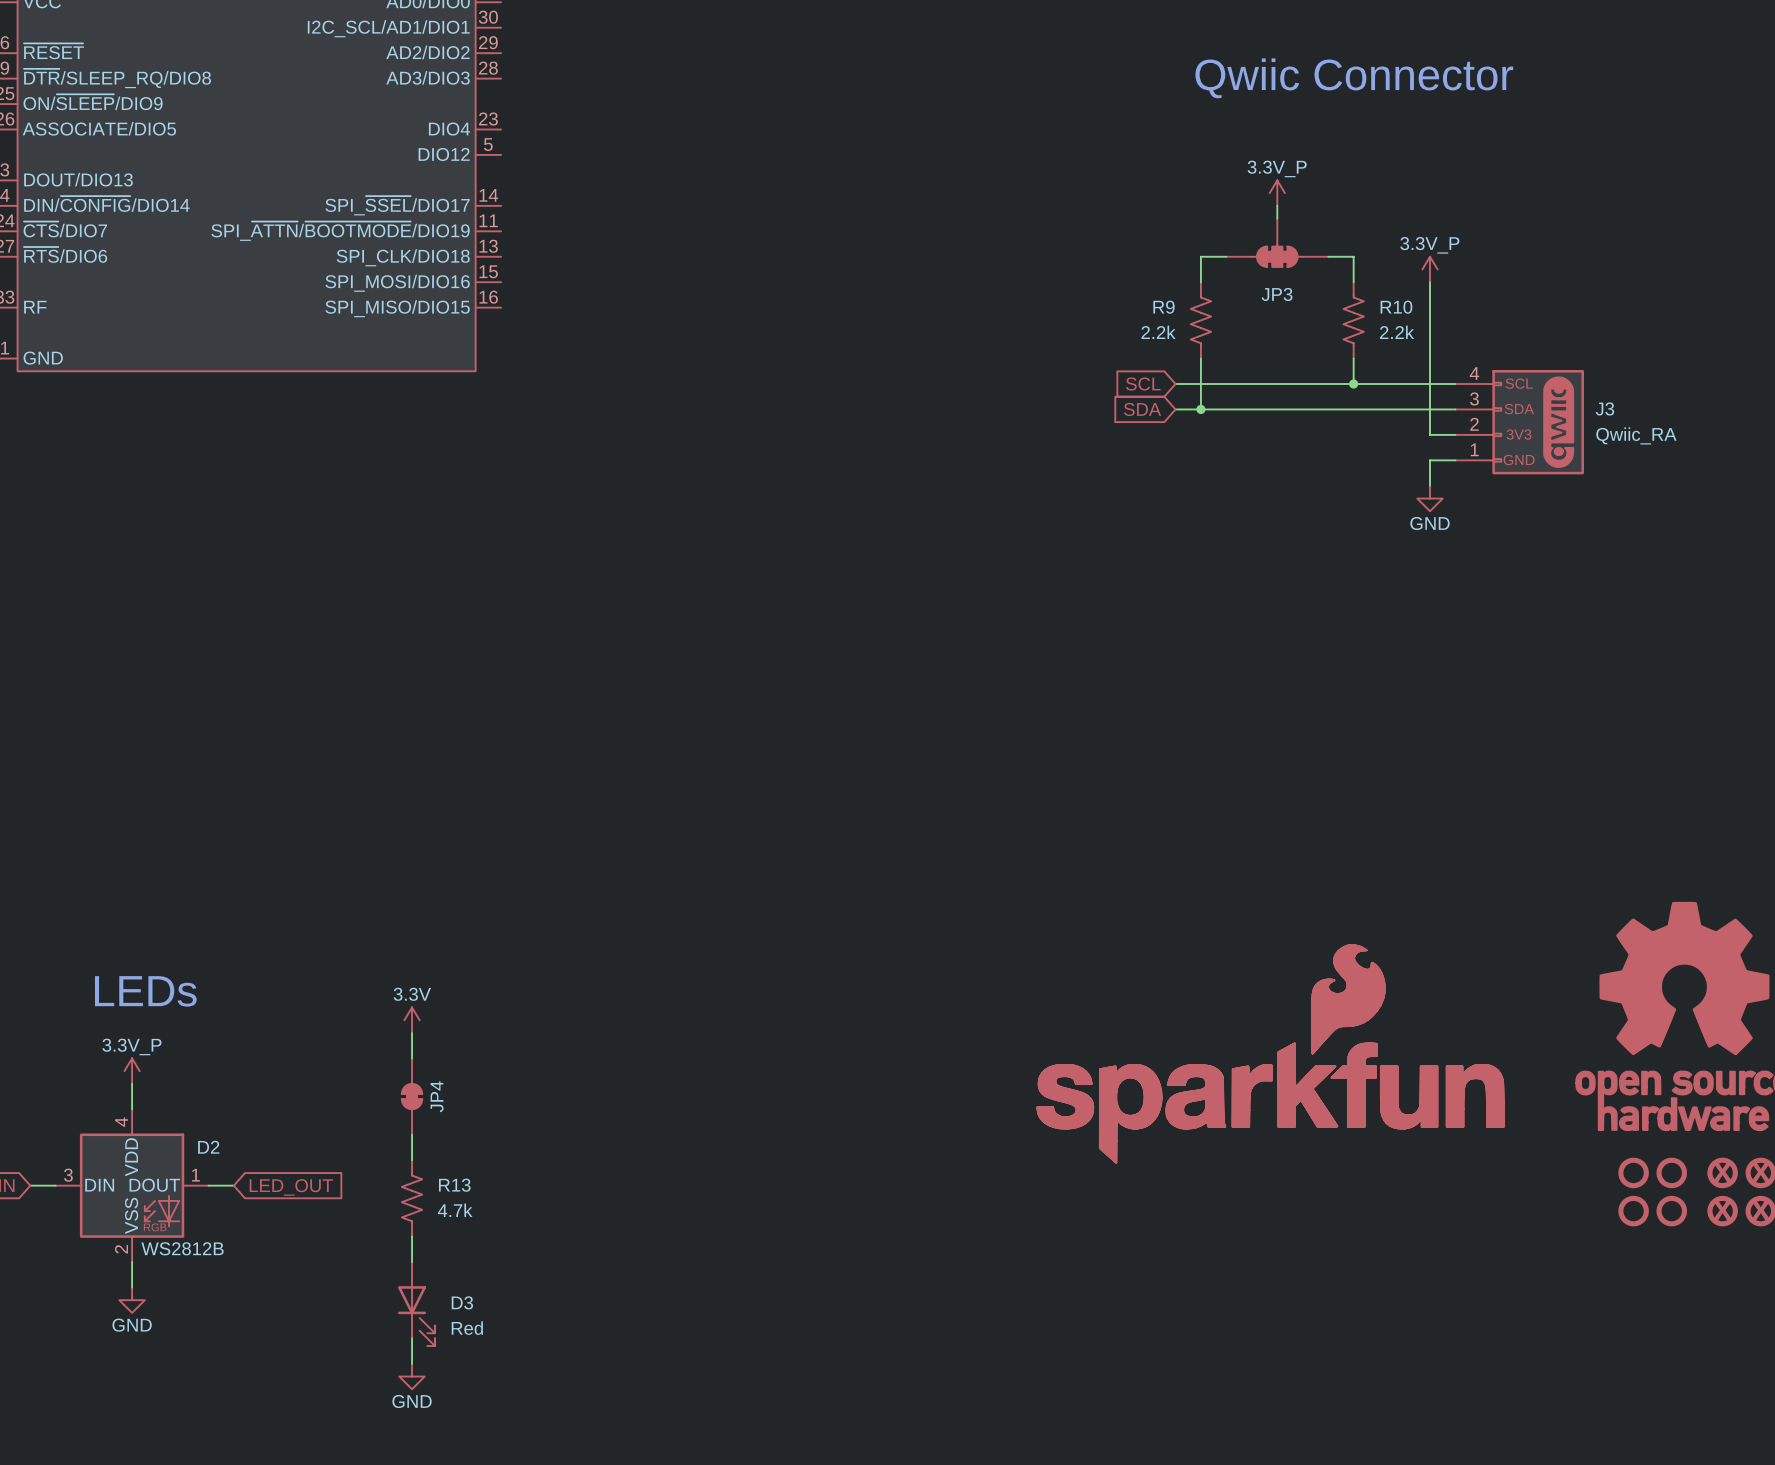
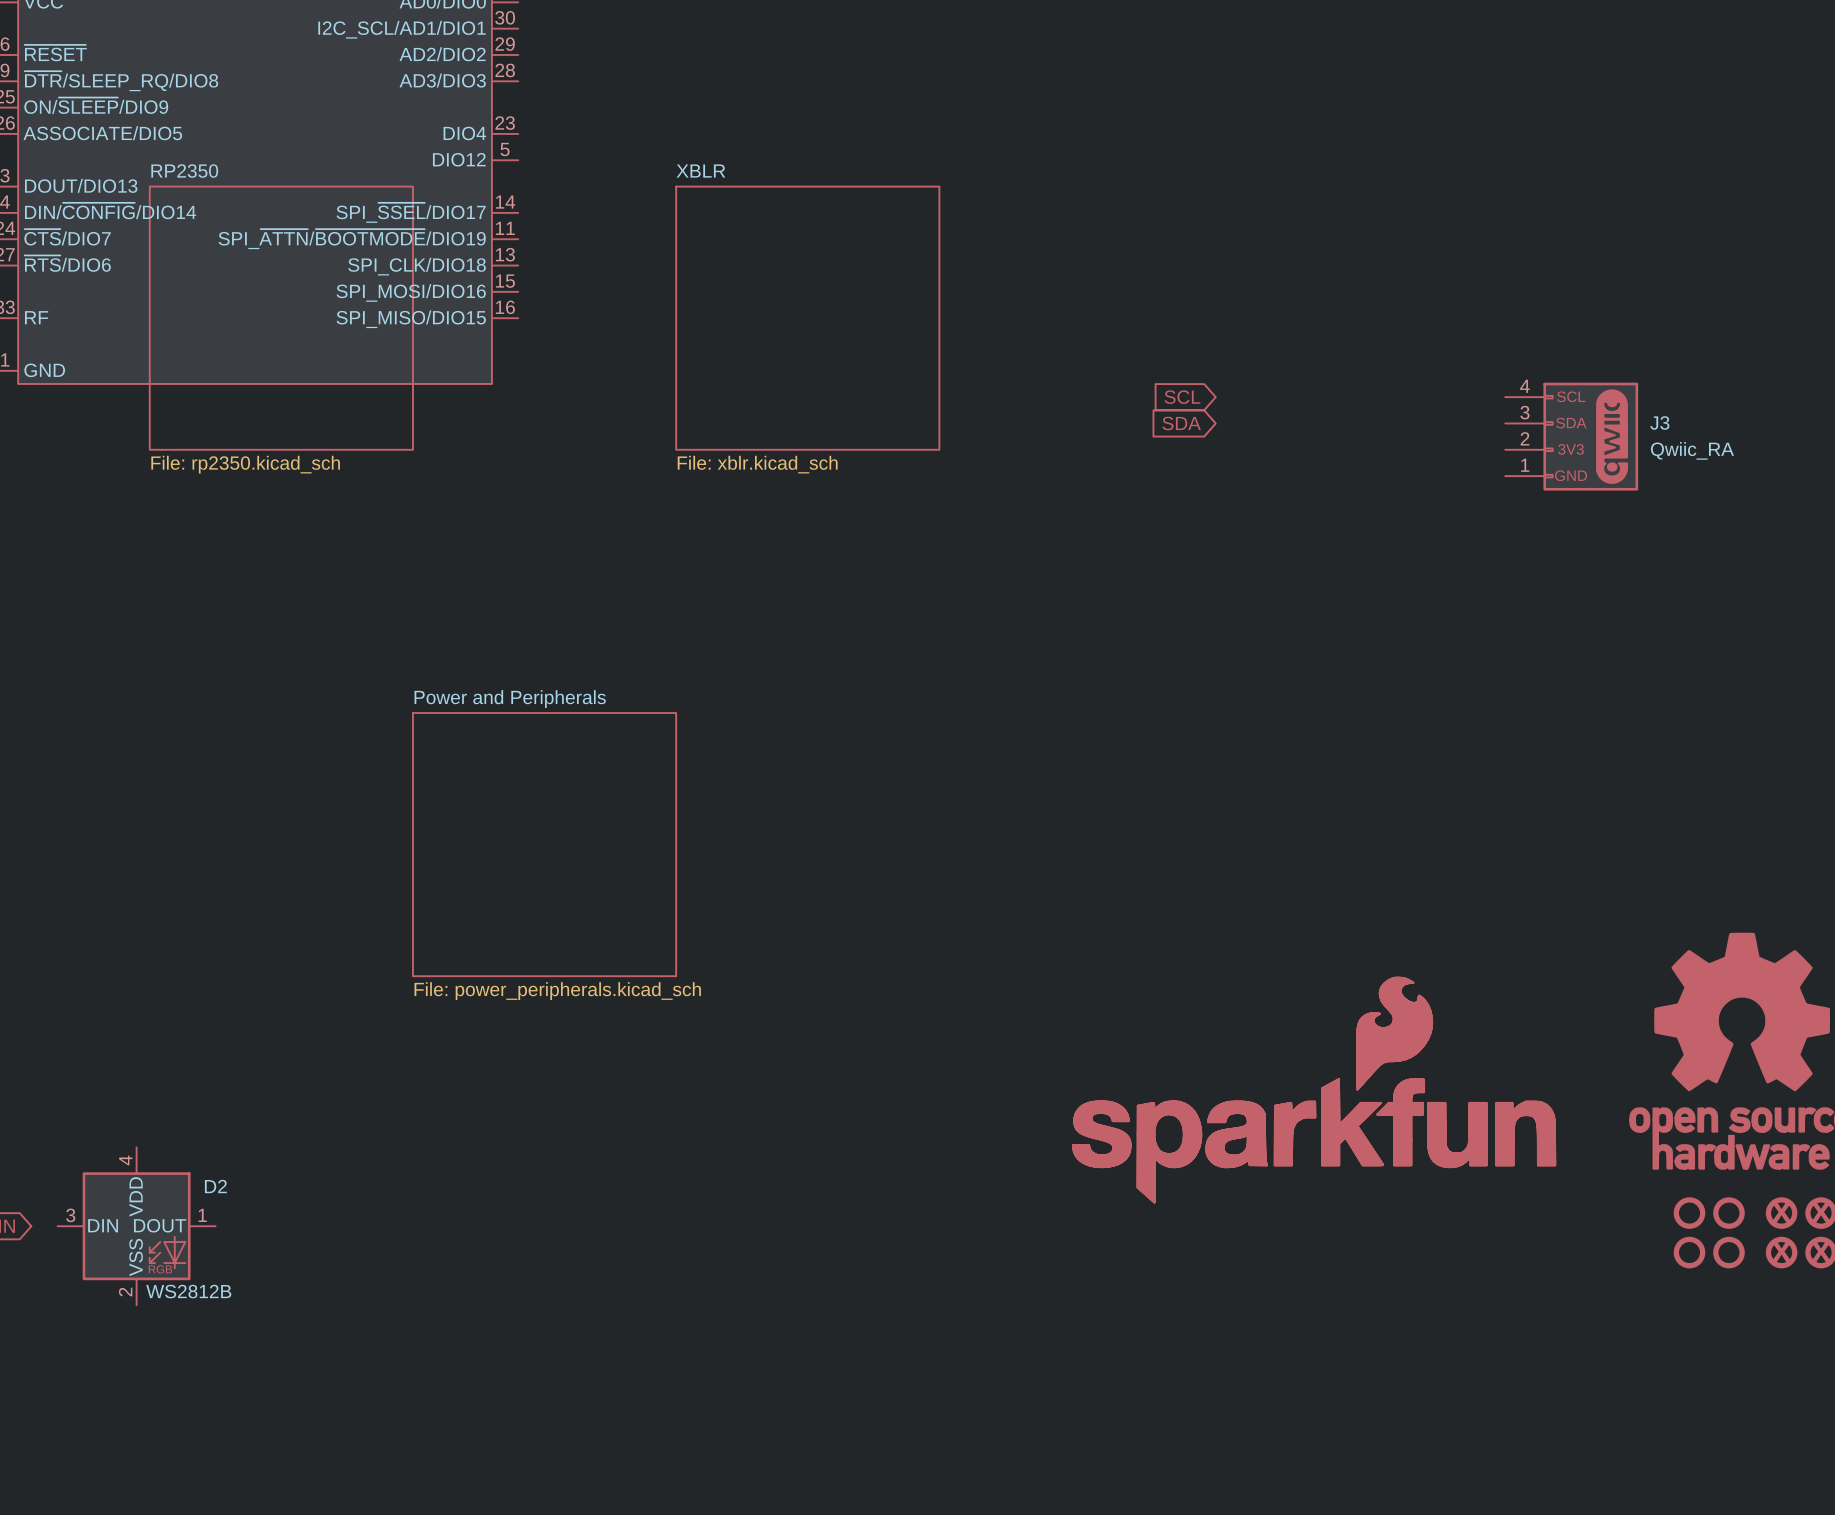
text: Qwiic Connector (1354, 78) -> none
power symbol: 3.3V_P (1277, 193) -> none
wire: (1277, 205) (1277, 218) -> none
JP3: (1277, 242) -> none
wire: (1226, 256) (1200, 256) (1200, 282) -> none
wire: (1328, 256) (1353, 256) (1353, 282) -> none
power symbol: 3.3V_P (1429, 269) -> none
wire: (1429, 282) (1429, 434) (1455, 434) -> none
sheet RP2350: none -> File: rp2350.kicad_sch (281, 318)
sheet XBLR: none -> File: xblr.kicad_sch (807, 318)
R9: 2.2k (1200, 320) -> none
R10: 2.2k (1353, 320) -> none
wire: (1200, 358) (1200, 409) -> none
wire: (1353, 358) (1353, 384) -> none
wire: (1175, 384) (1455, 384) -> none
junction: (1353, 384) -> none
wire: (1175, 409) (1455, 409) -> none
junction: (1200, 409) -> none
wire: (1455, 460) (1429, 460) (1429, 485) -> none
power symbol: GND (1429, 498) -> none
sheet Power and Peripherals: none -> File: power_peripherals.kicad_sch (544, 844)
text: LEDs (145, 991) -> none
power symbol: 3.3V (412, 1020) -> none
wire: (412, 1032) (412, 1058) -> none
power symbol: 3.3V_P (132, 1071) -> none
wire: (132, 1083) (132, 1109) -> none
JP4: (412, 1096) -> none
wire: (412, 1134) (412, 1160) -> none
wire: (30, 1185) (55, 1185) -> none
wire: (208, 1185) (233, 1185) -> none
global label: LED_OUT (291, 1187) -> none
R13: 4.7k (412, 1198) -> none
wire: (412, 1236) (412, 1262) -> none
wire: (132, 1262) (132, 1287) -> none
power symbol: GND (132, 1300) -> none
D3: Red (416, 1304) -> none
wire: (412, 1338) (412, 1363) -> none
power symbol: GND (412, 1376) -> none

